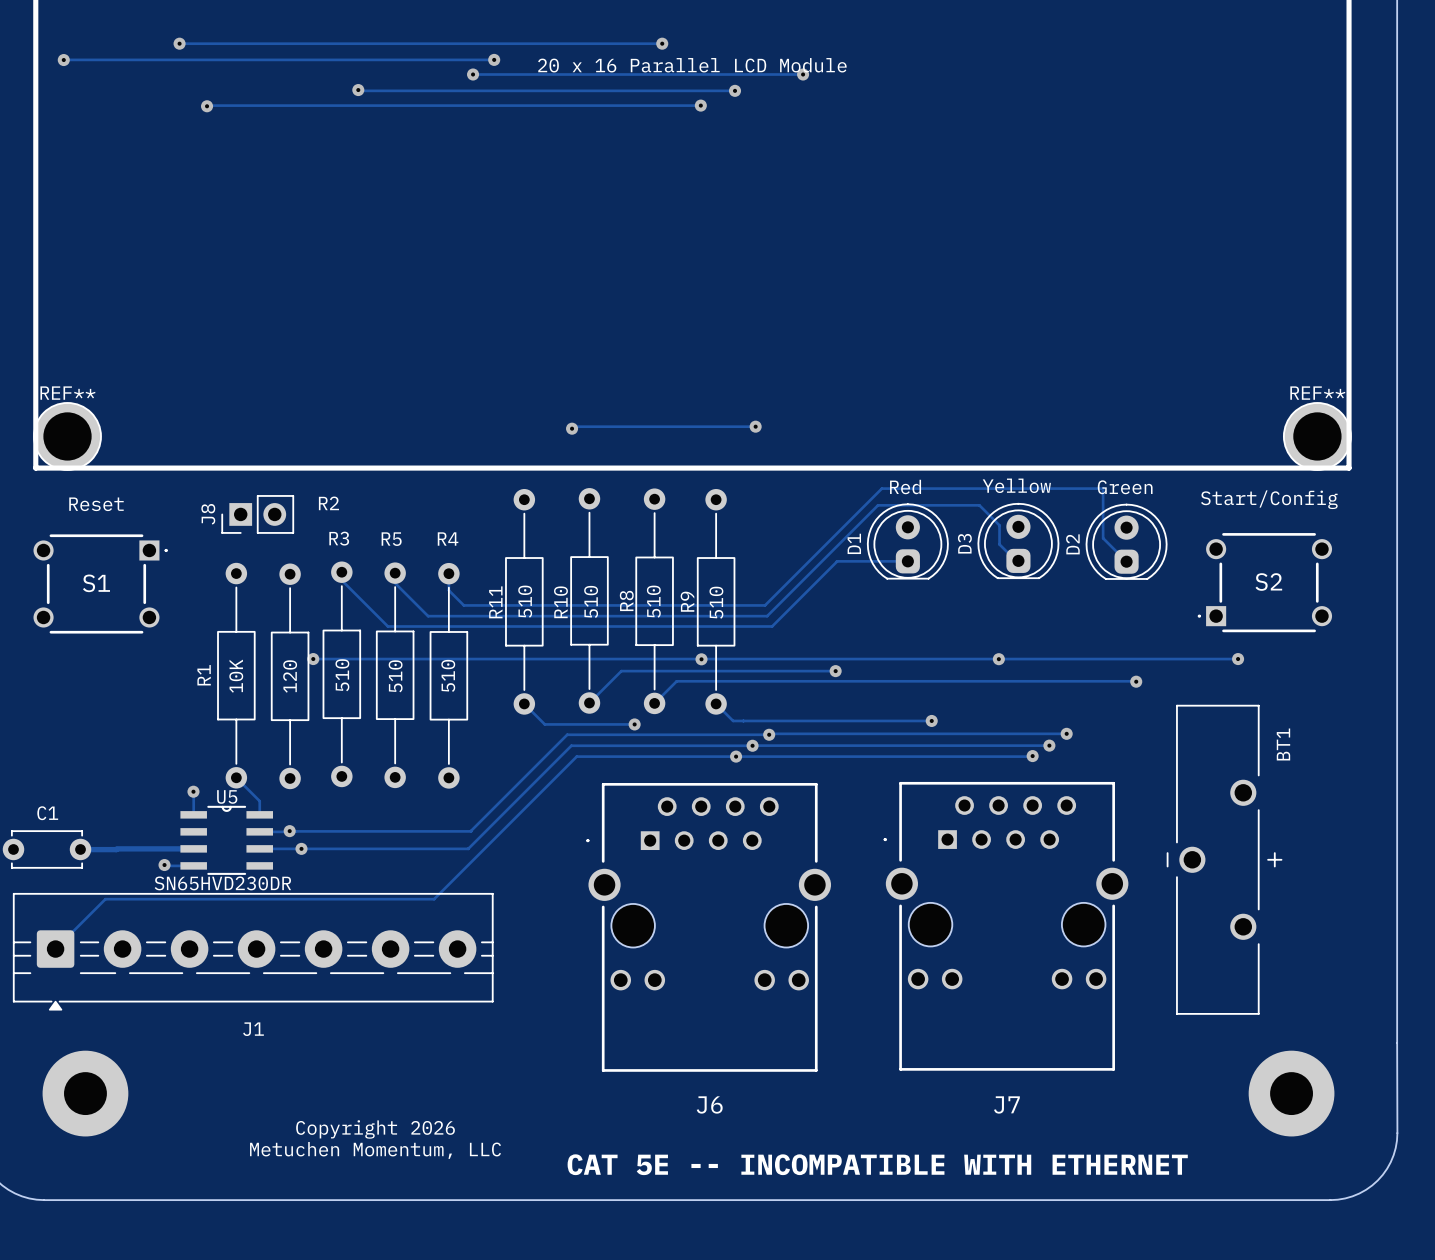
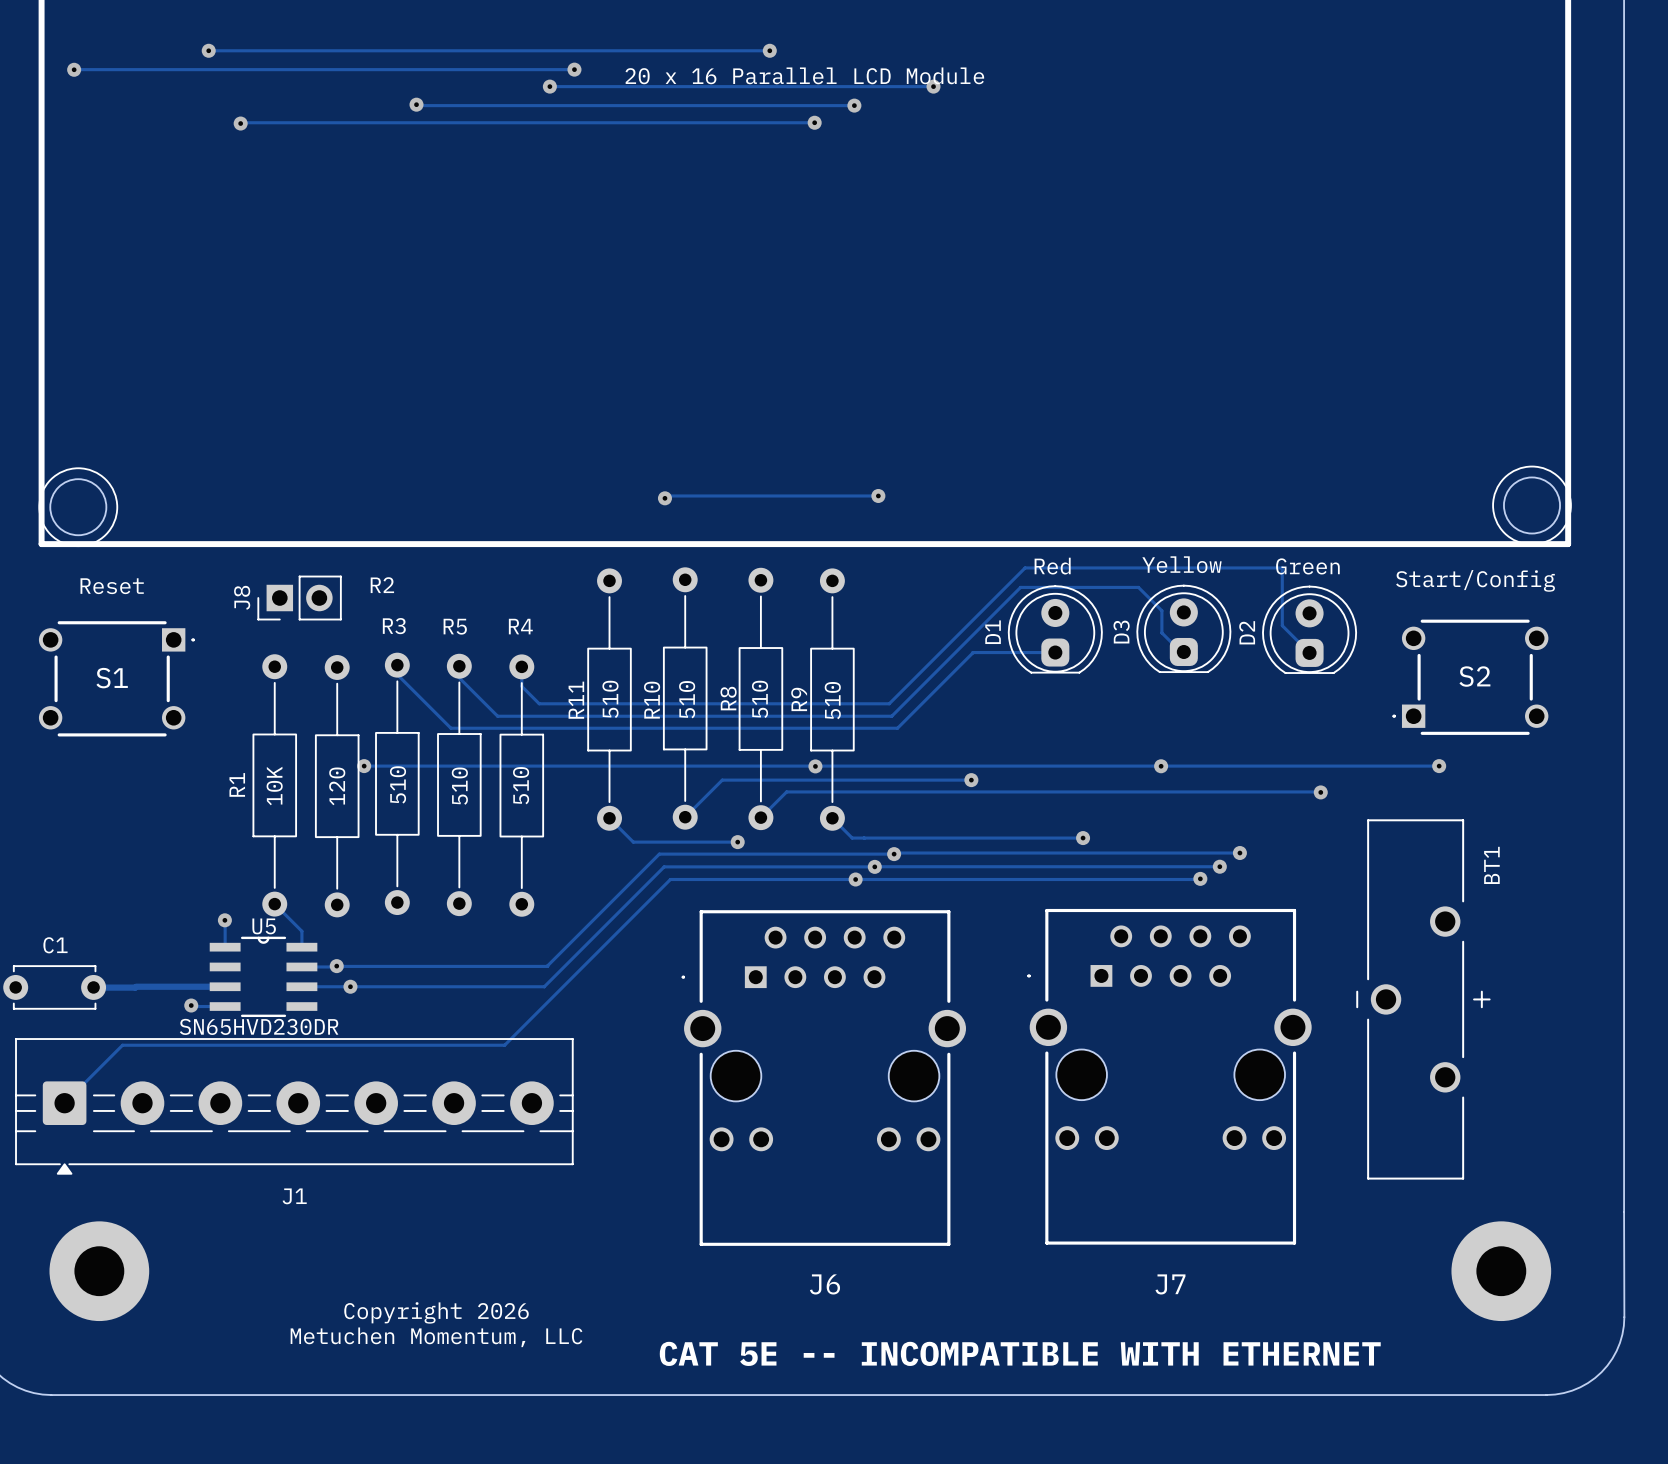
drawing: none -> [1492, 465, 1572, 546]
drawing: none -> [38, 467, 119, 547]
REF**: (67, 436) -> none
REF**: (1317, 436) -> none

